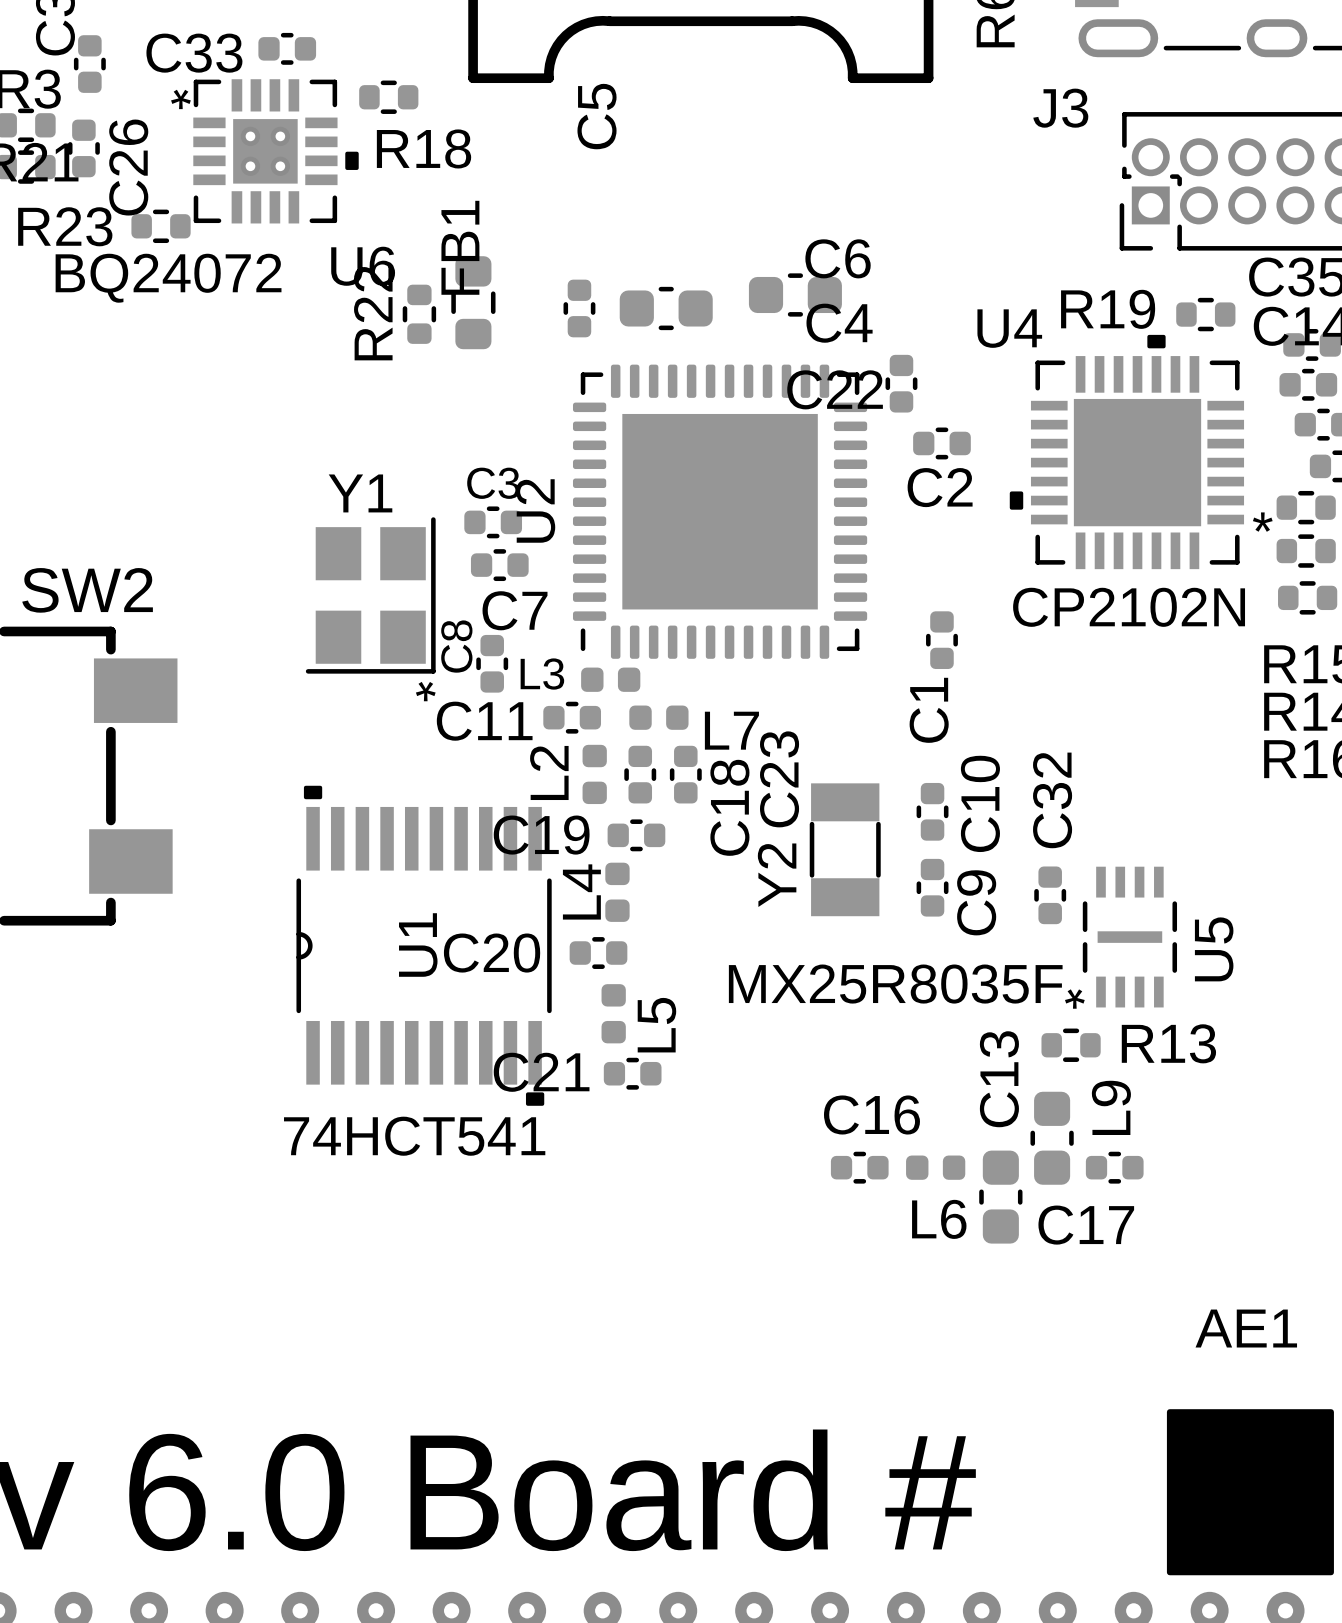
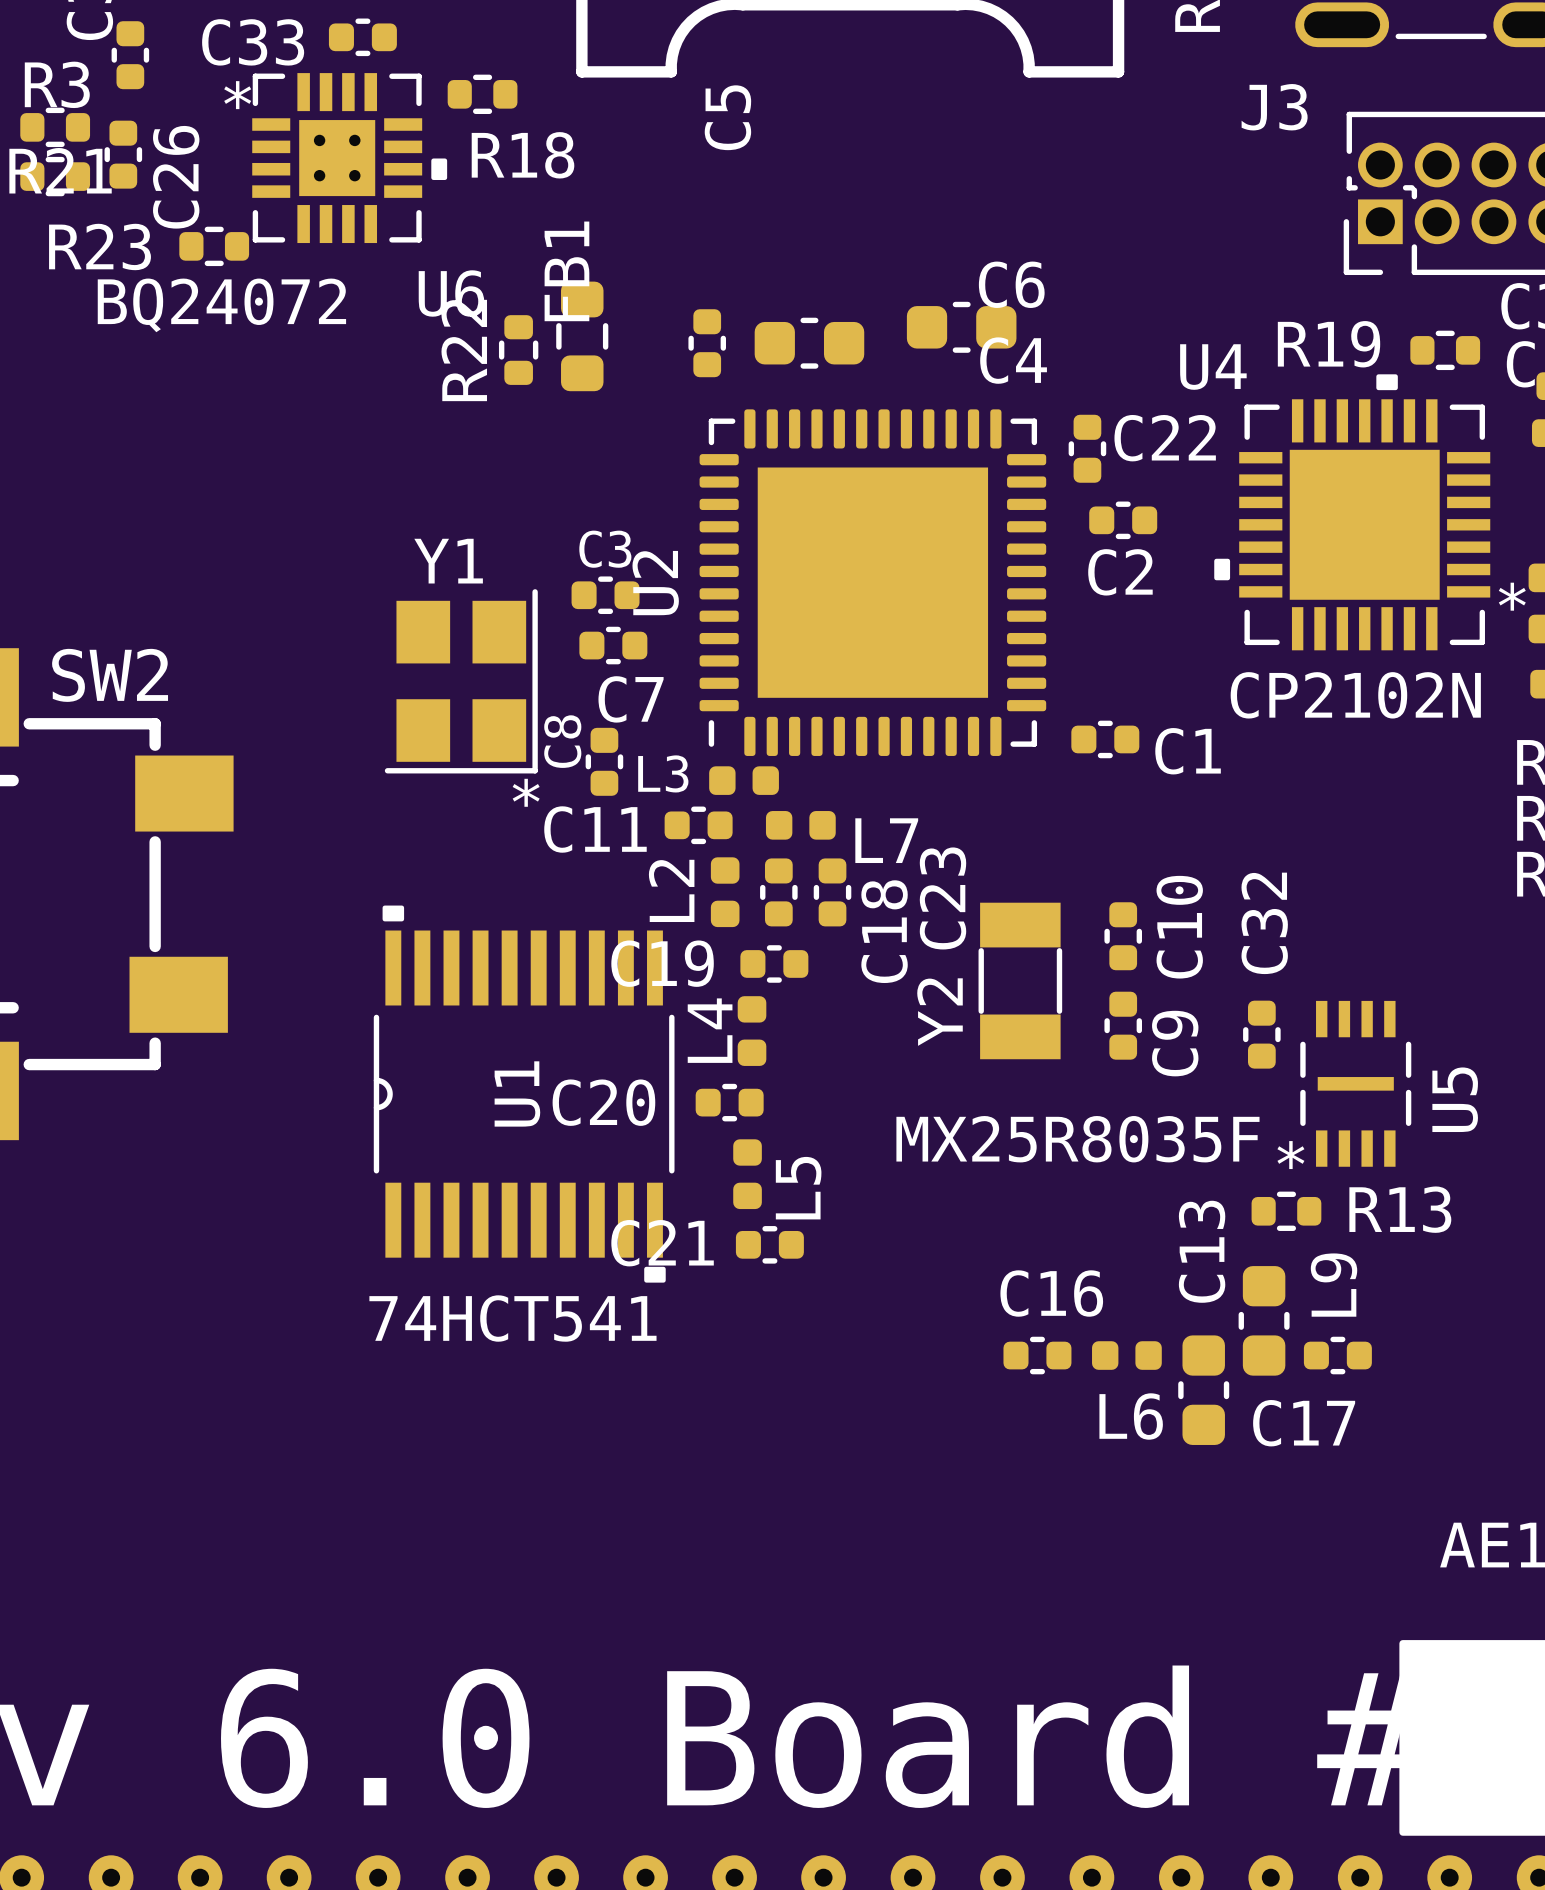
C22 position: (901, 383) -> (1087, 448)
C22 name position: C22 (835, 389) -> C22 (1165, 438)
C2 position: (941, 443) -> (1123, 520)
C1 rotation: 0° (941, 640) -> 90° clockwise (1105, 739)
C1 name position: C1 (929, 710) -> C1 (1188, 751)

